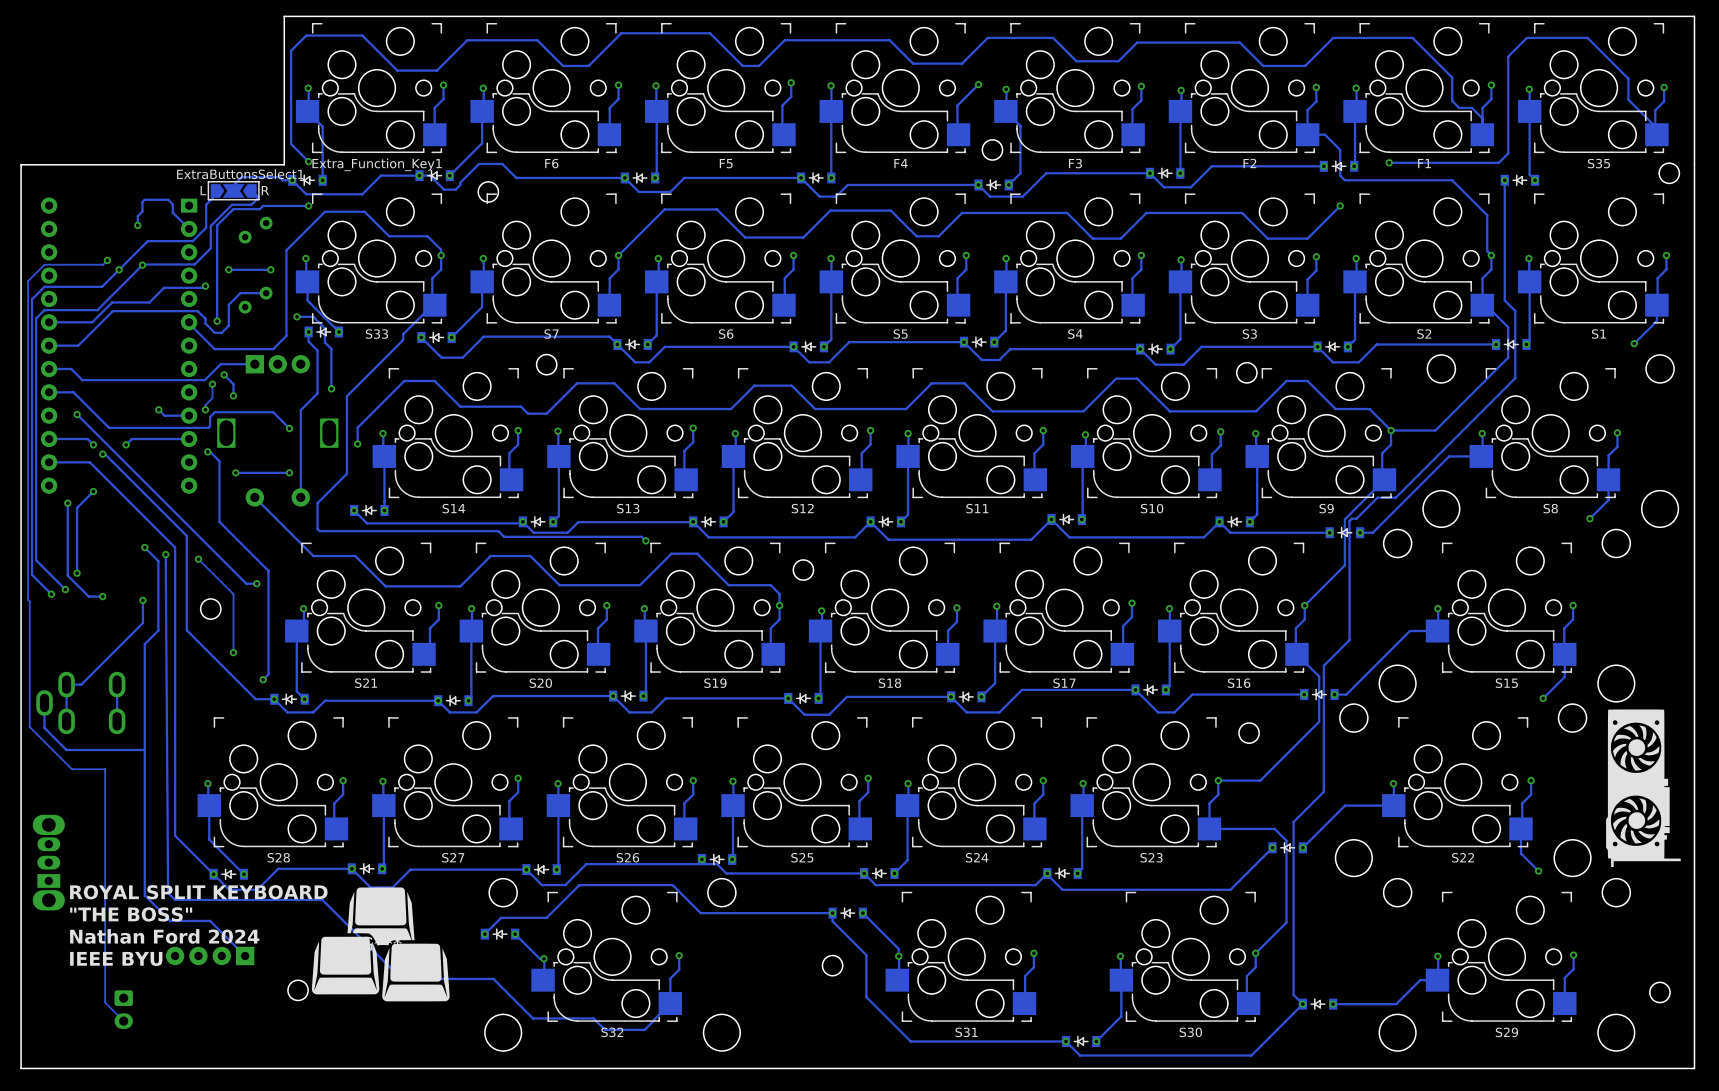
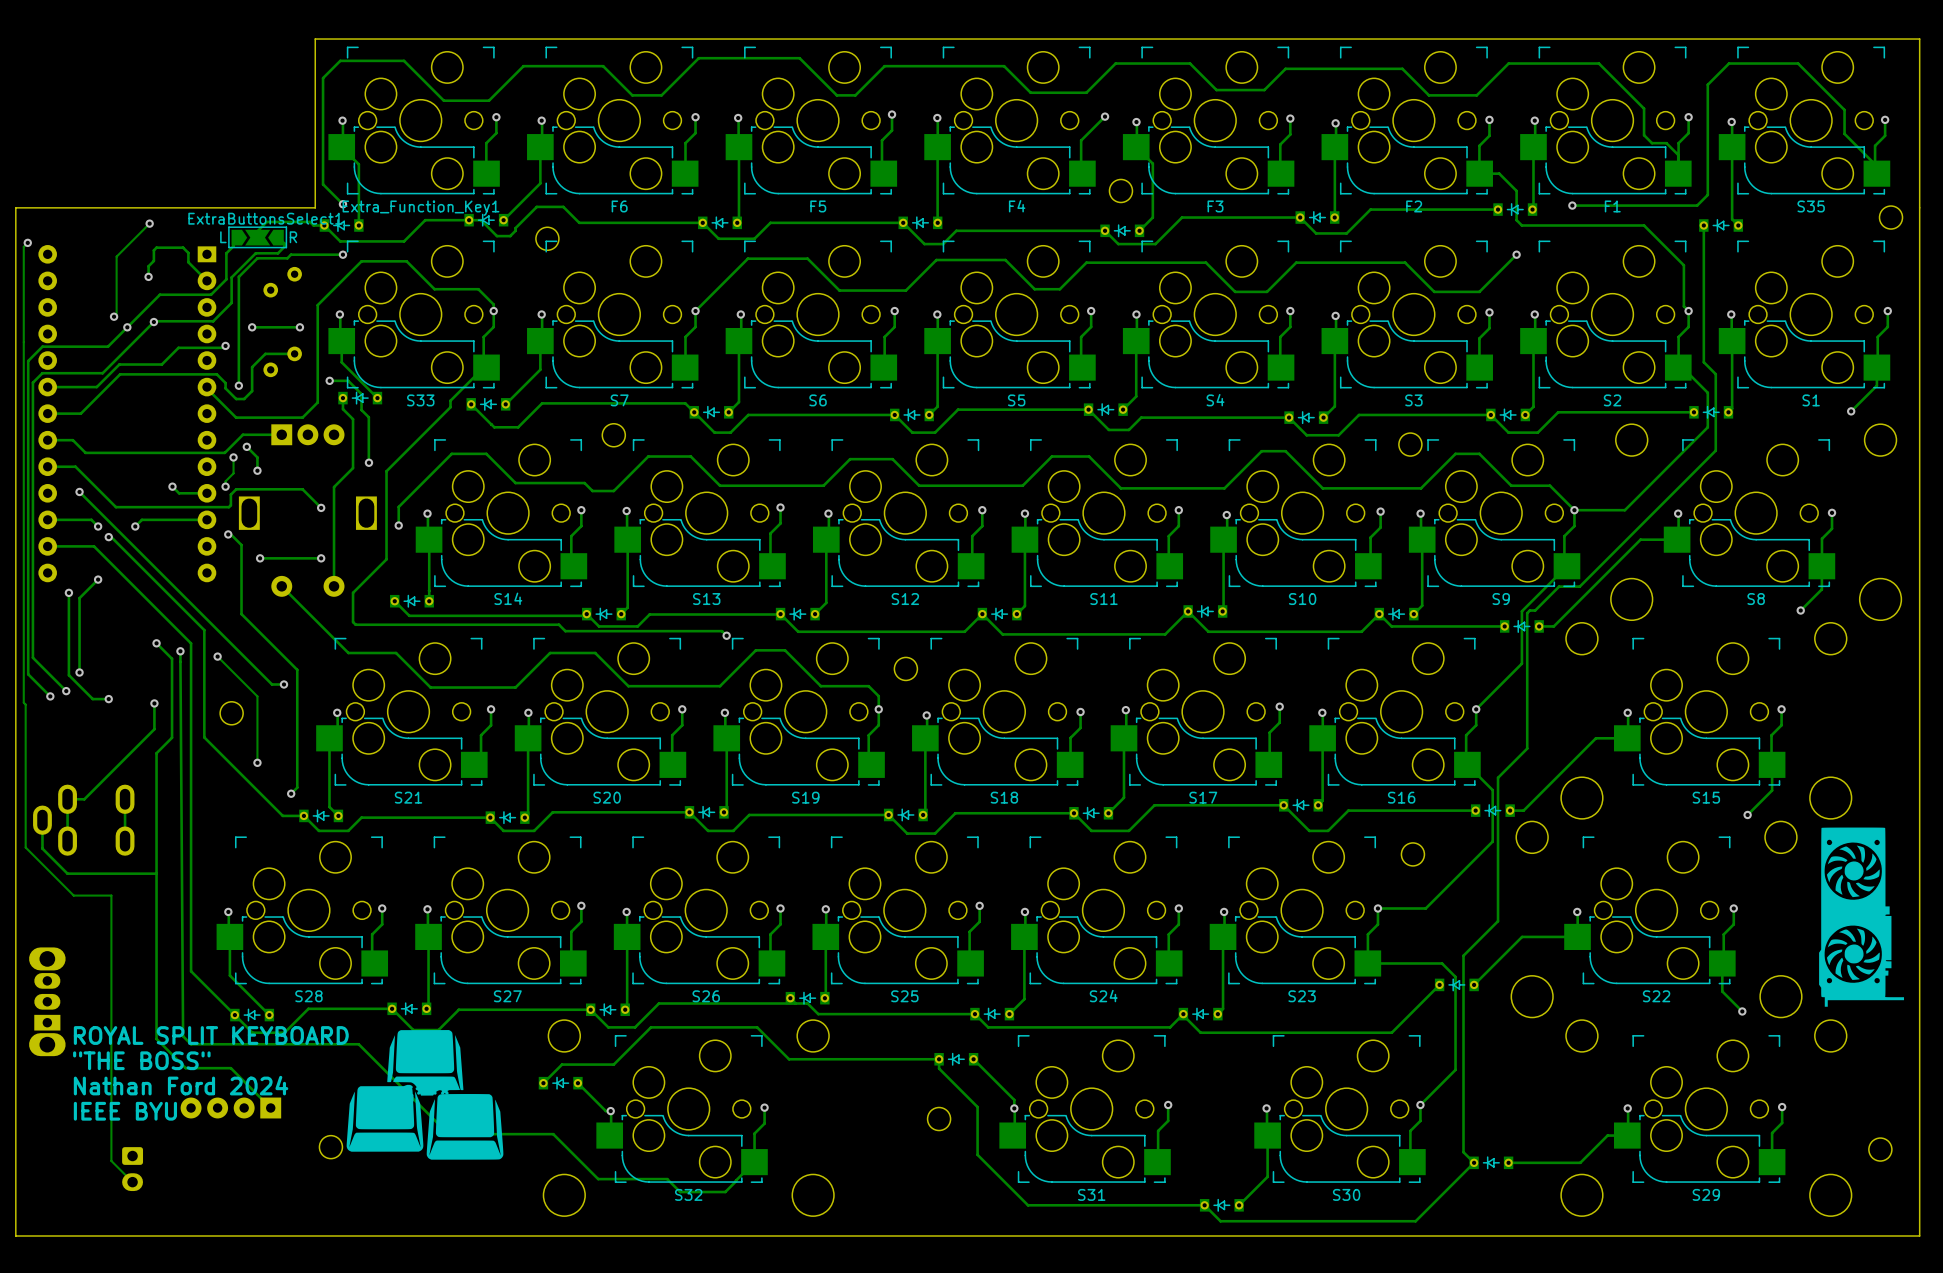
track: none -> (149, 223) (116, 256) (116, 316)
via: none -> (149, 223)
via: none -> (27, 242)
track: (107, 260) (103, 264) (44, 264) (28, 281) -> (27, 242) (23, 246) (23, 340)

